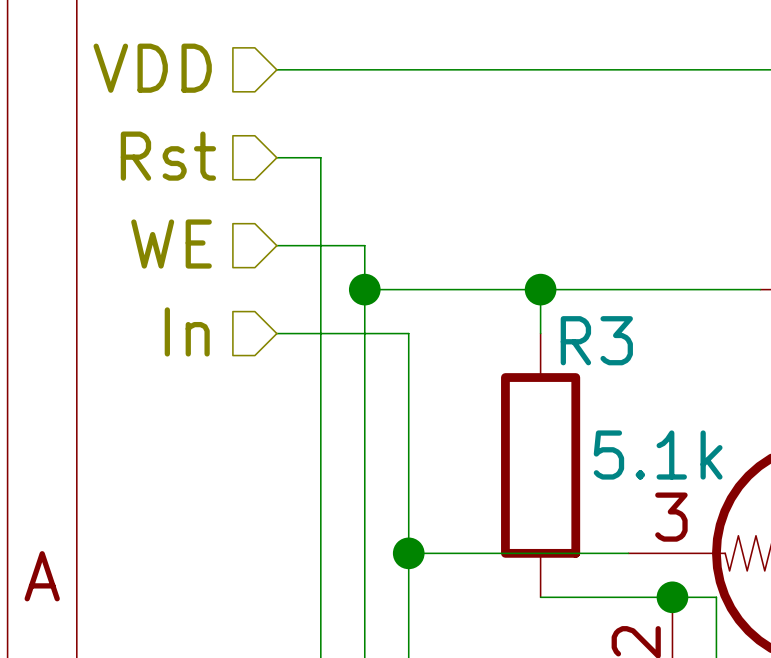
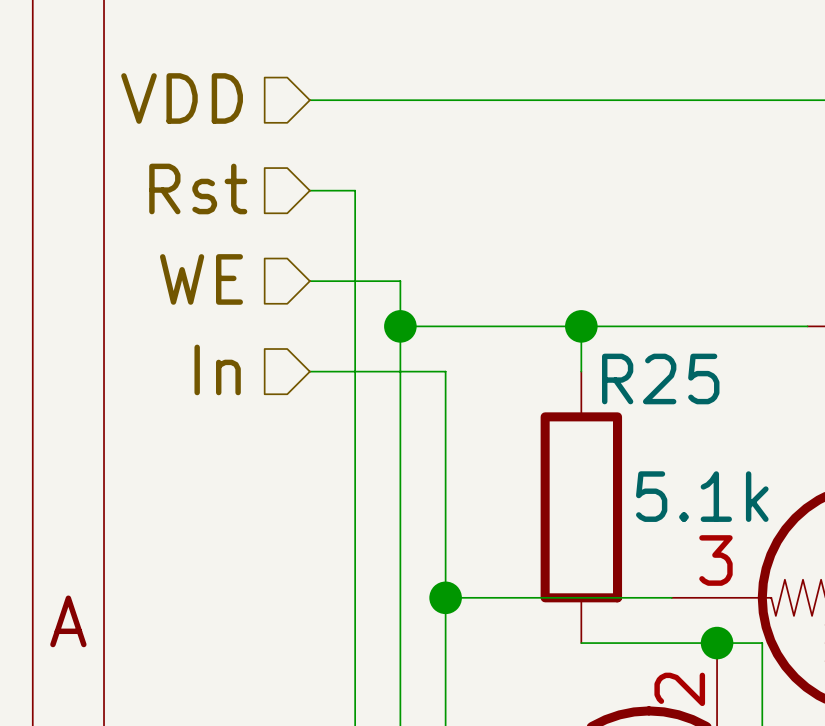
R3 name: R3 (596, 340) -> R25 (660, 378)

